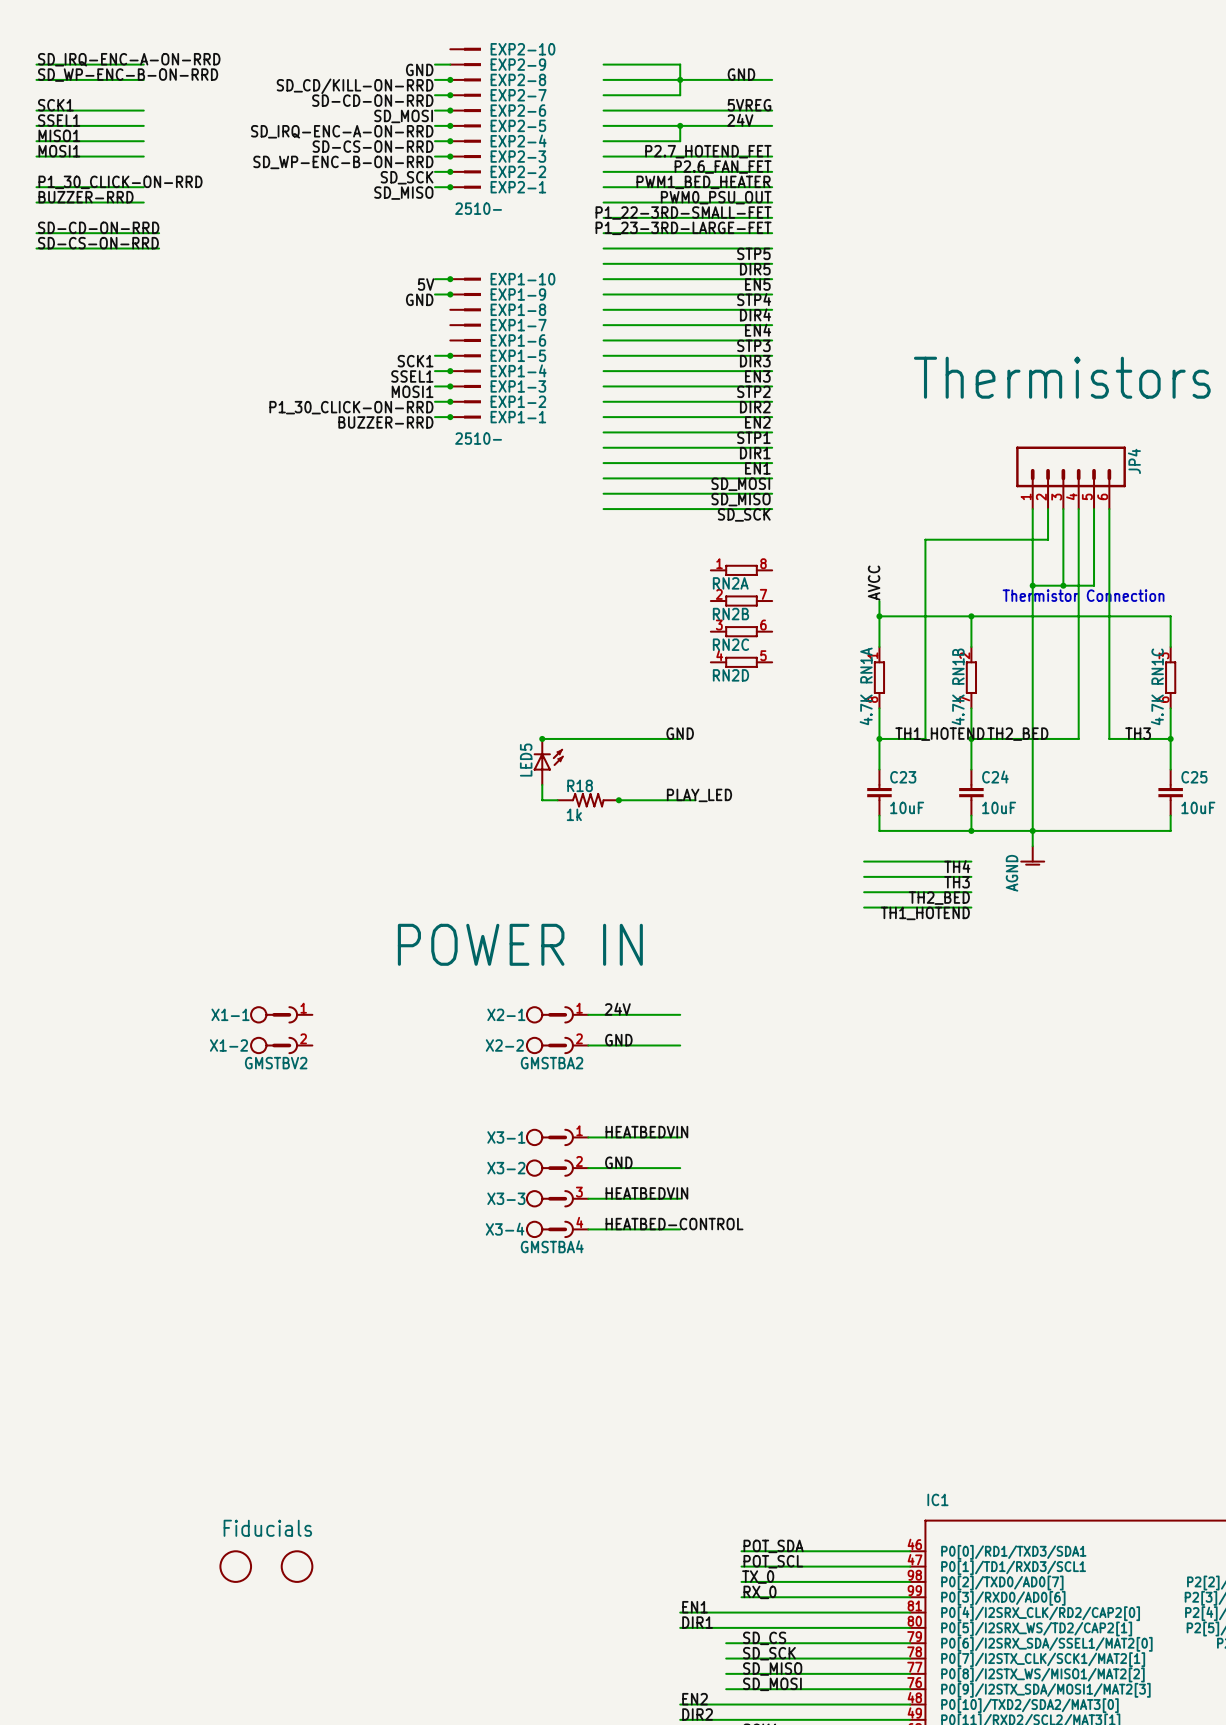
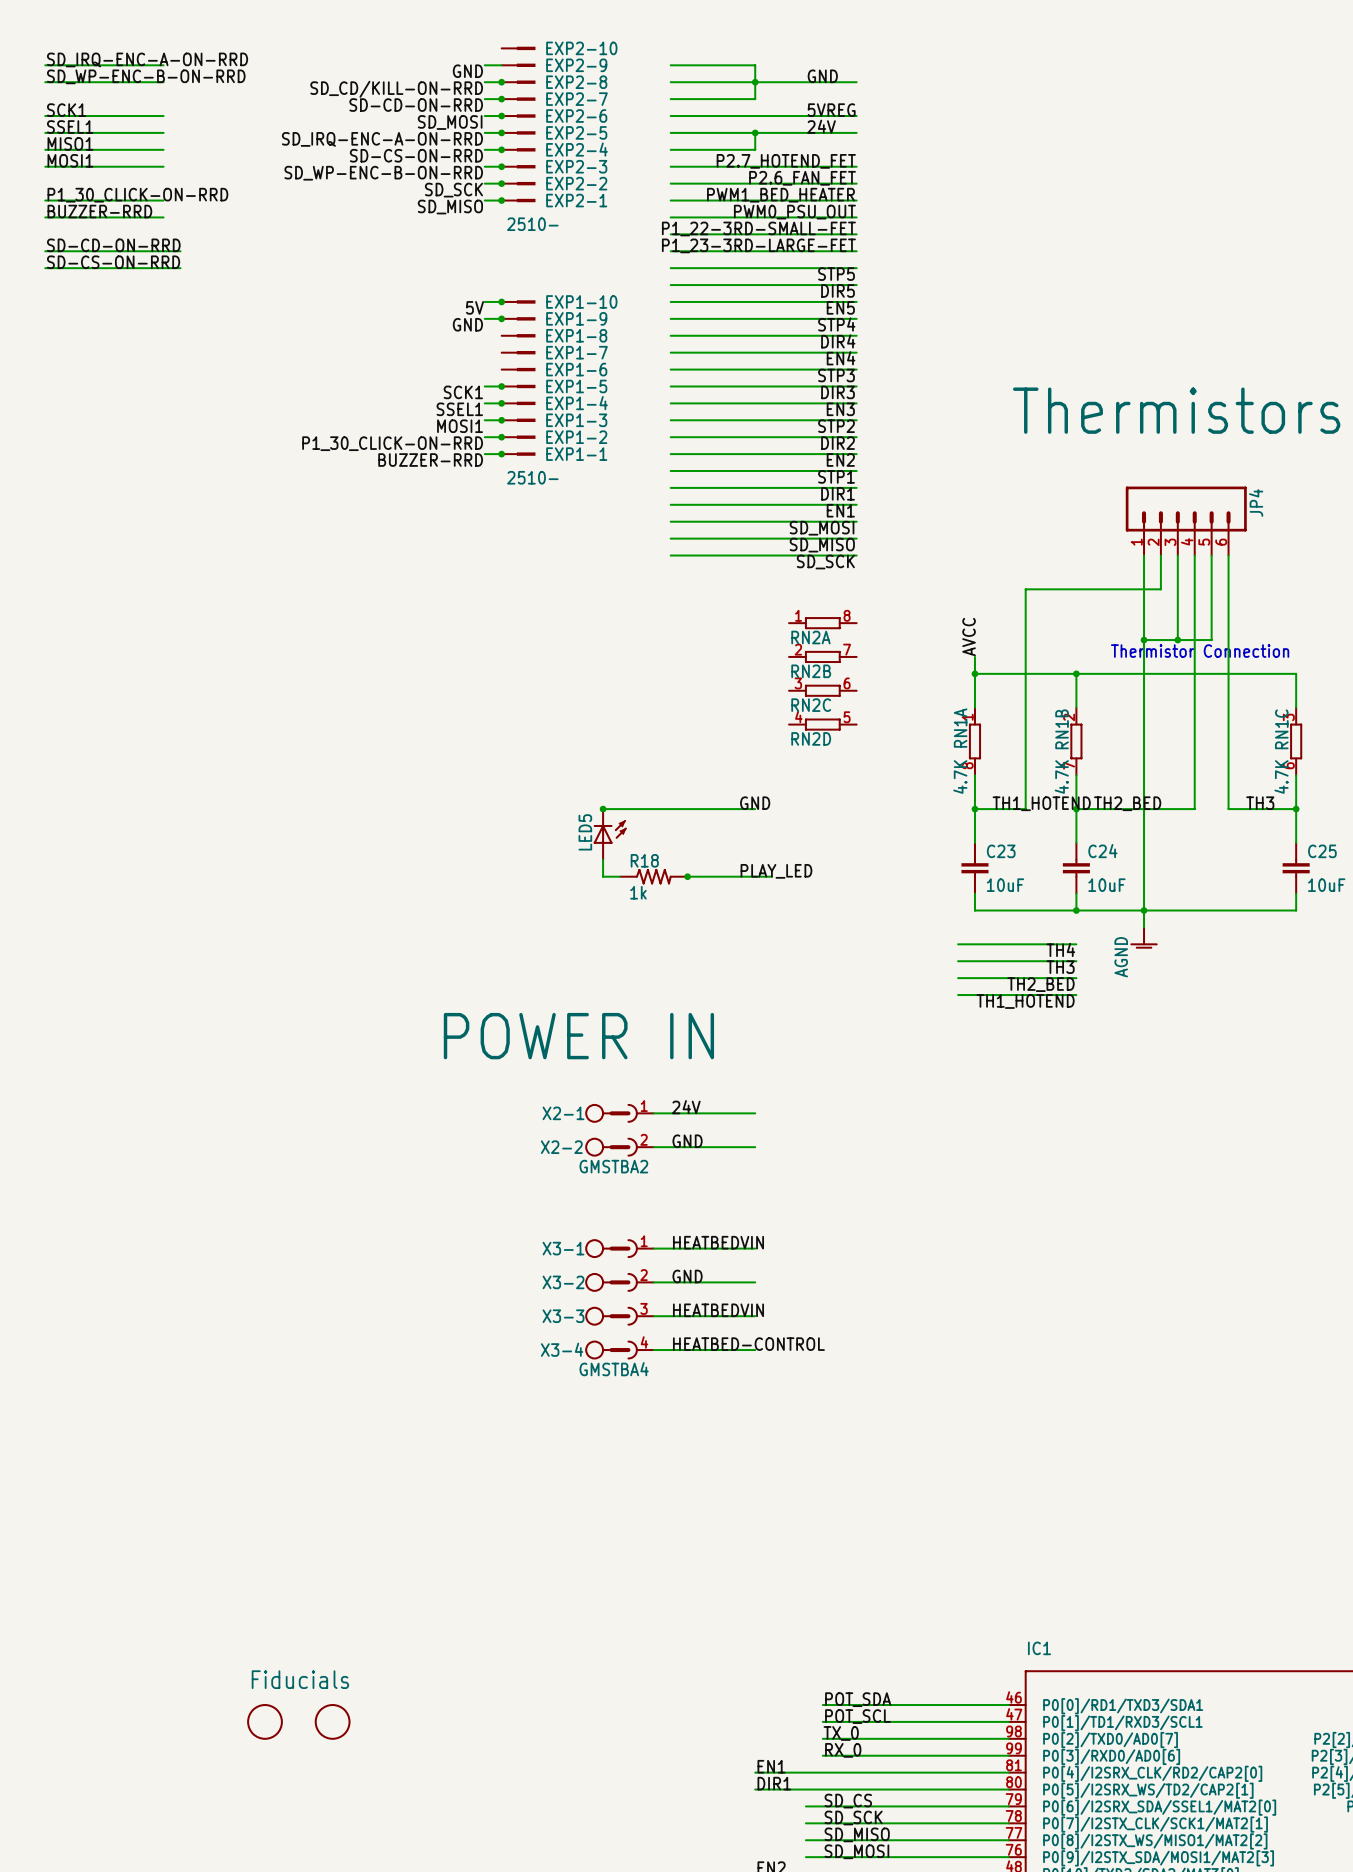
X1-1: (281, 1014) -> none
X1-2: GMSTBV2 (281, 1045) -> none

